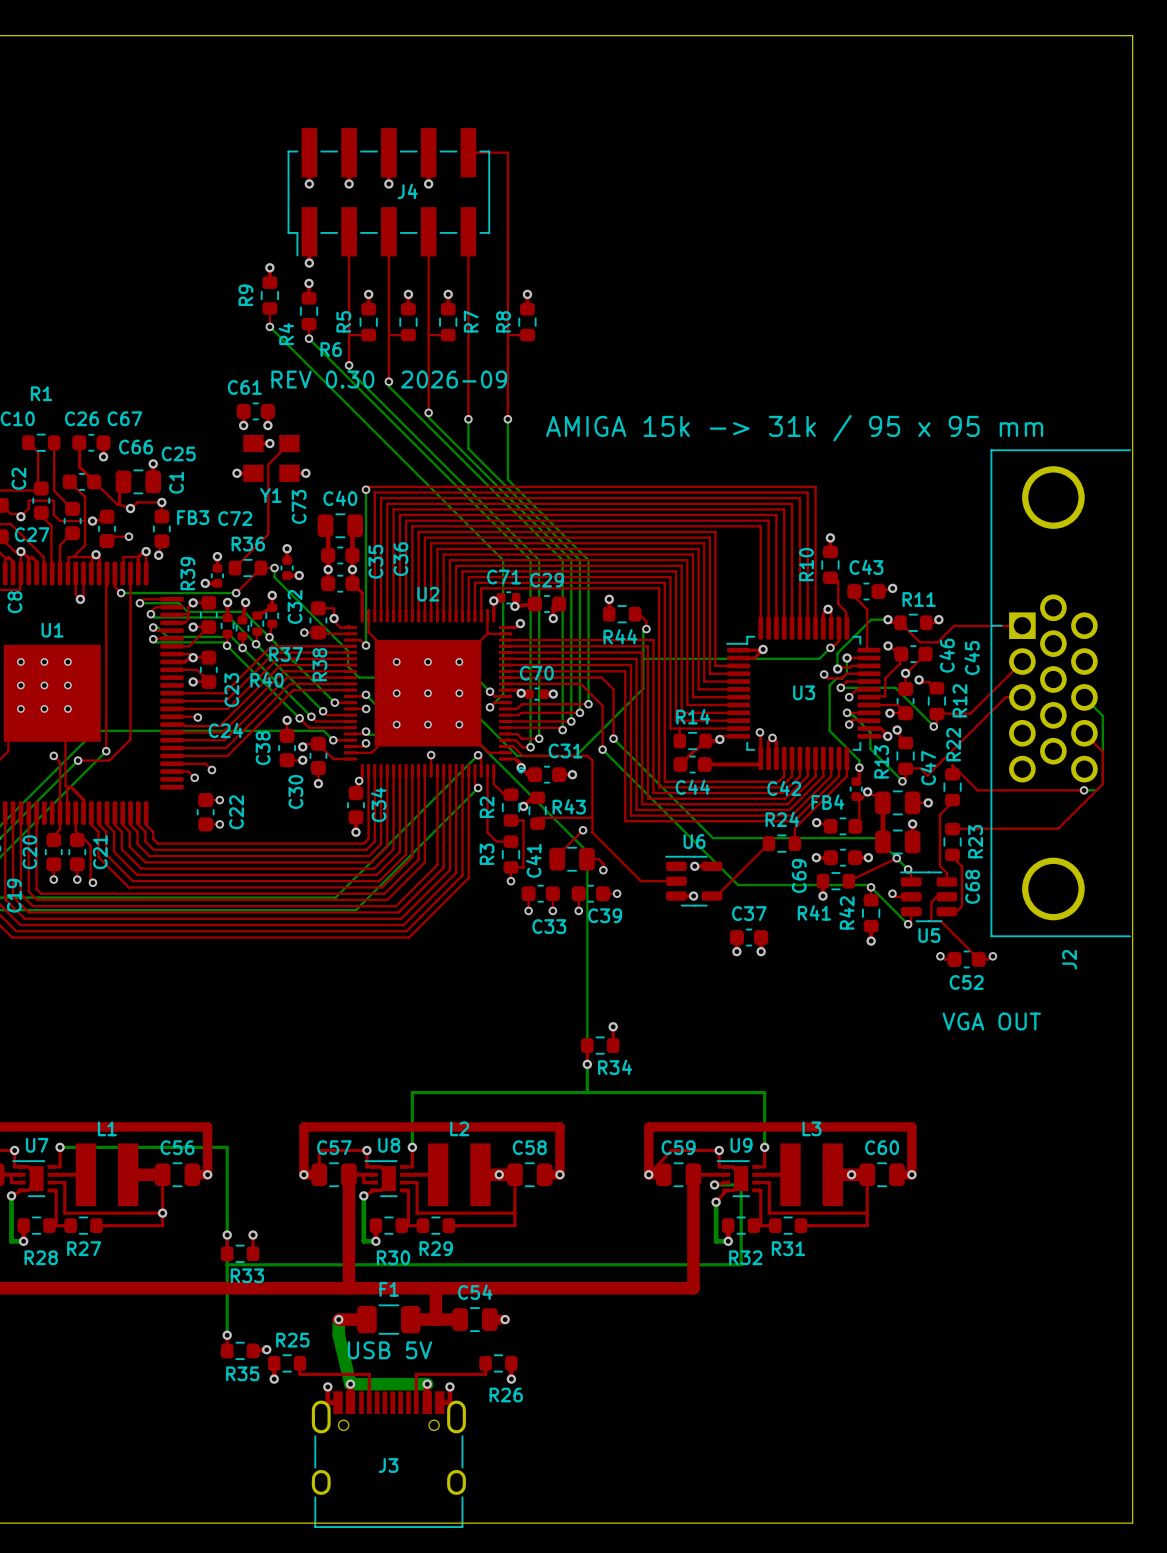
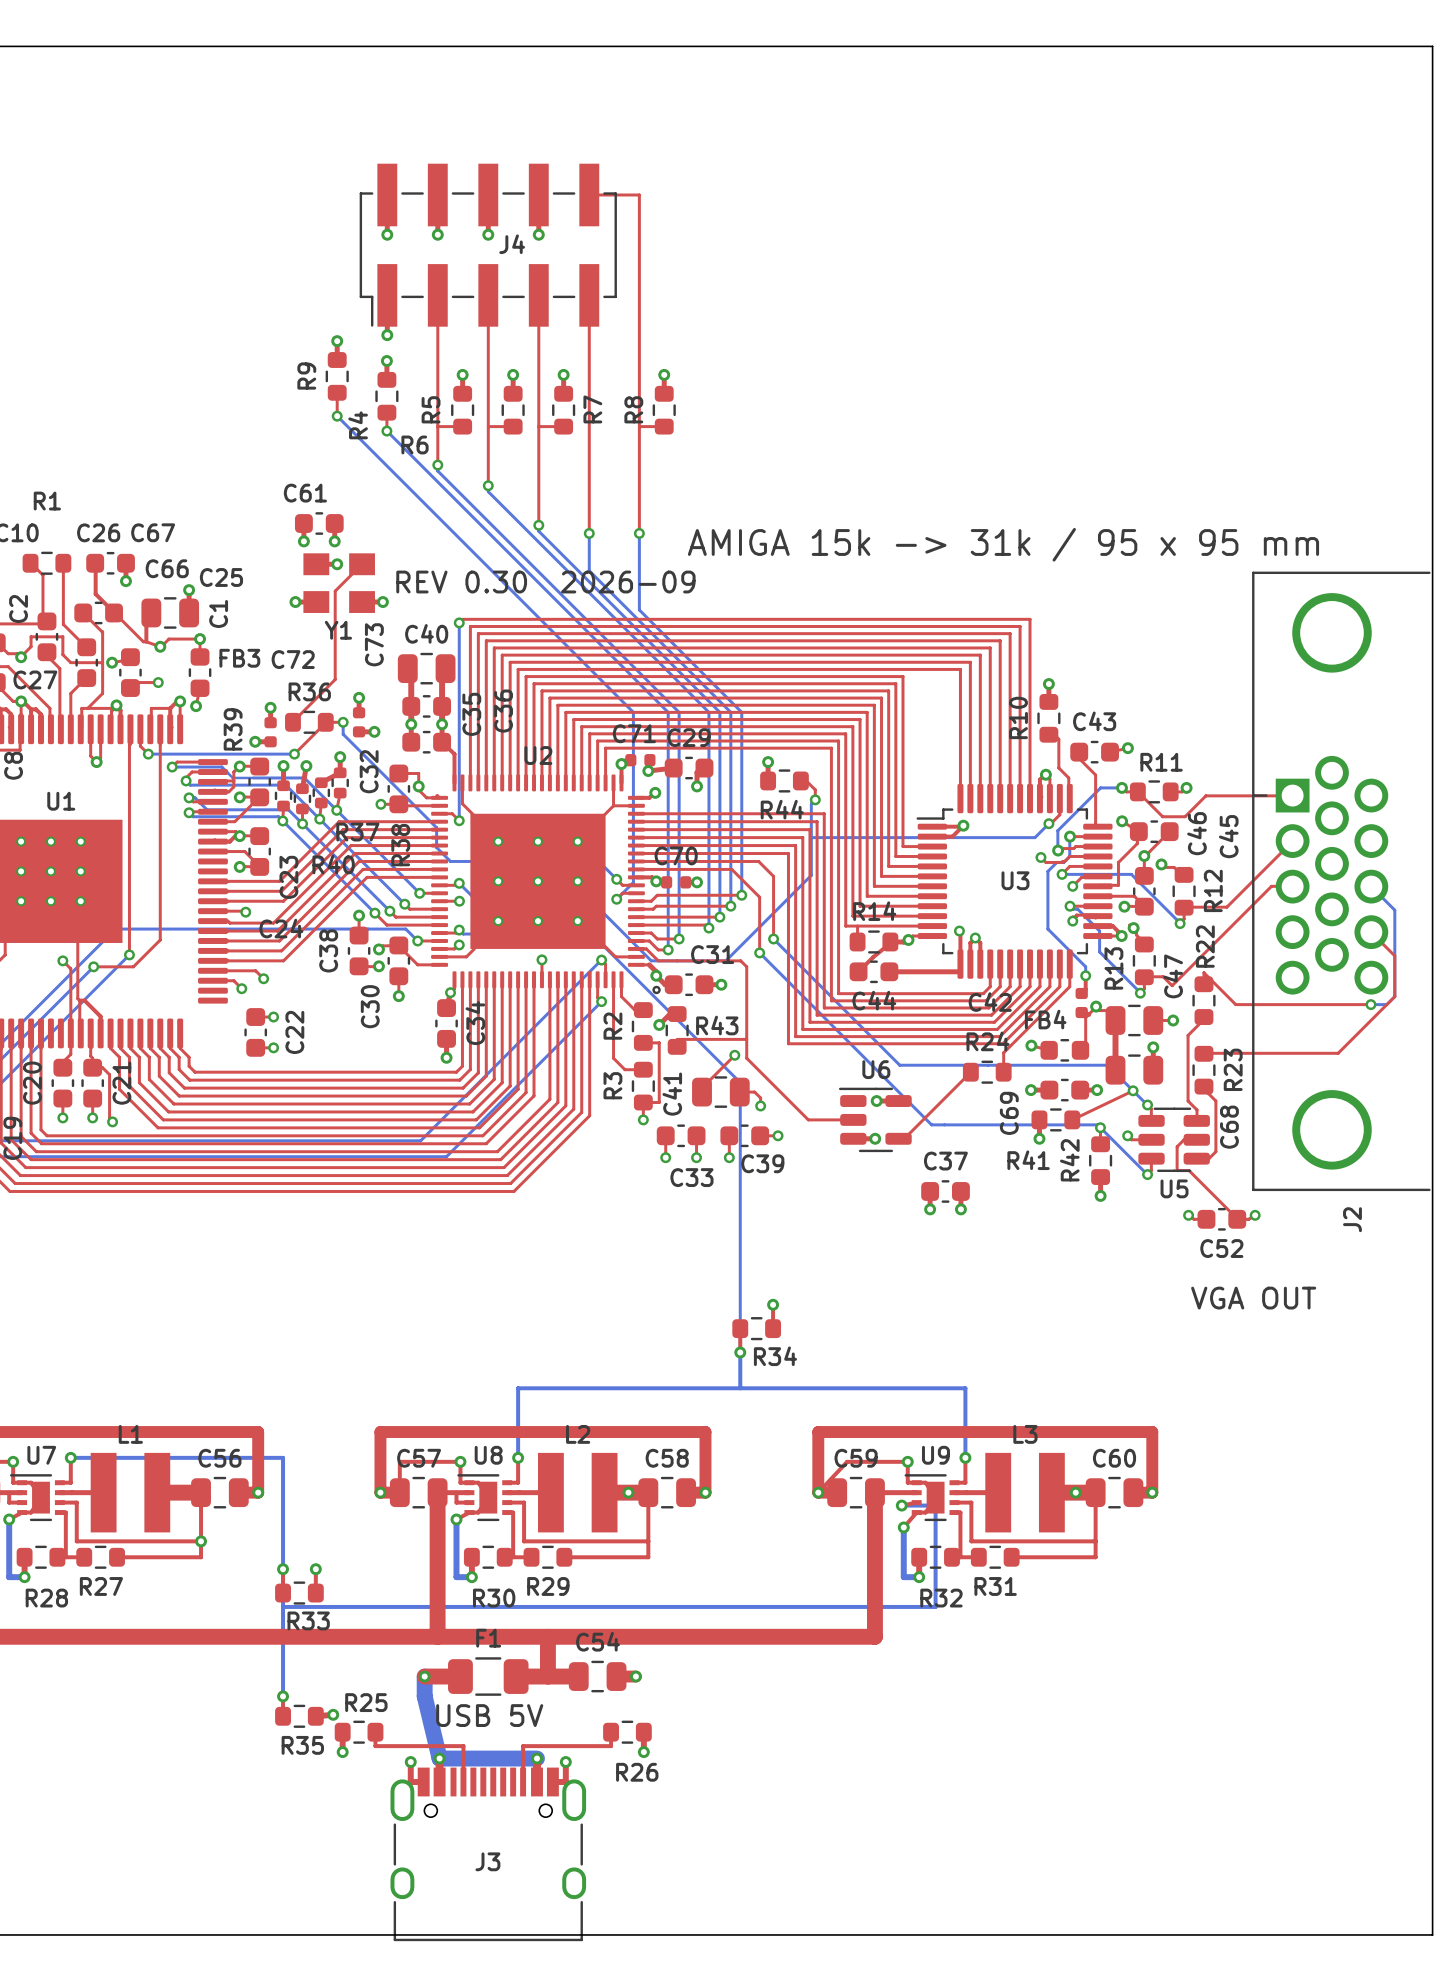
text position: REV 0.30 2026-09 (389, 379) -> REV 0.30 2026-09 (545, 582)
C73 footprint: [280, 556, 294, 580] -> [352, 707, 366, 738]
C72 footprint: [210, 563, 225, 588] -> [264, 717, 277, 748]
C71 footprint: [496, 591, 521, 605] -> [625, 754, 656, 767]
U2 footprint: [343, 609, 525, 778] -> [431, 774, 661, 995]
C70 footprint: [524, 687, 549, 701] -> [661, 876, 692, 889]
C42 footprint: [849, 777, 863, 802] -> [1075, 987, 1088, 1019]
R2 footprint: [501, 788, 521, 827] -> [631, 1002, 653, 1051]
C68 footprint: [875, 829, 921, 855] -> [1105, 1054, 1164, 1085]
U5 footprint: [899, 871, 958, 923] -> [1138, 1107, 1210, 1172]

